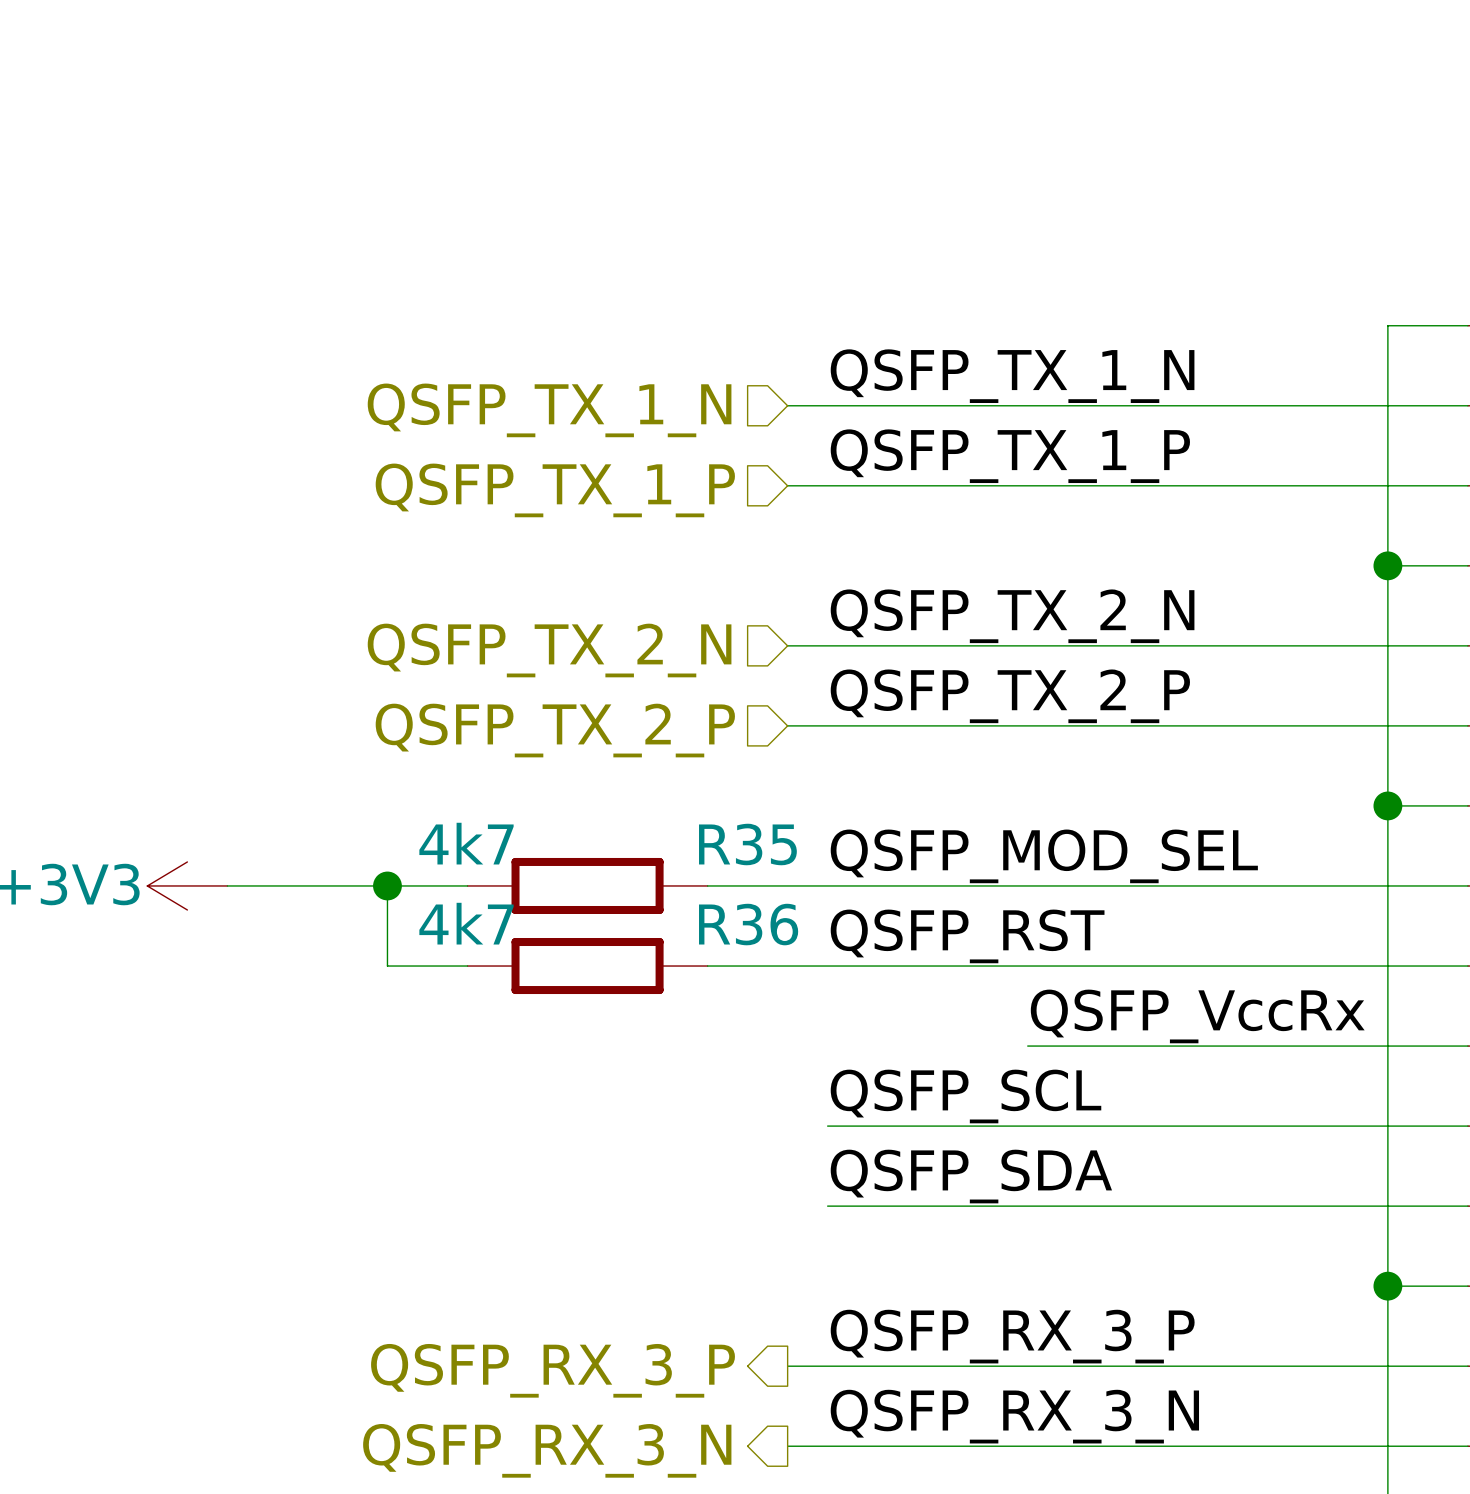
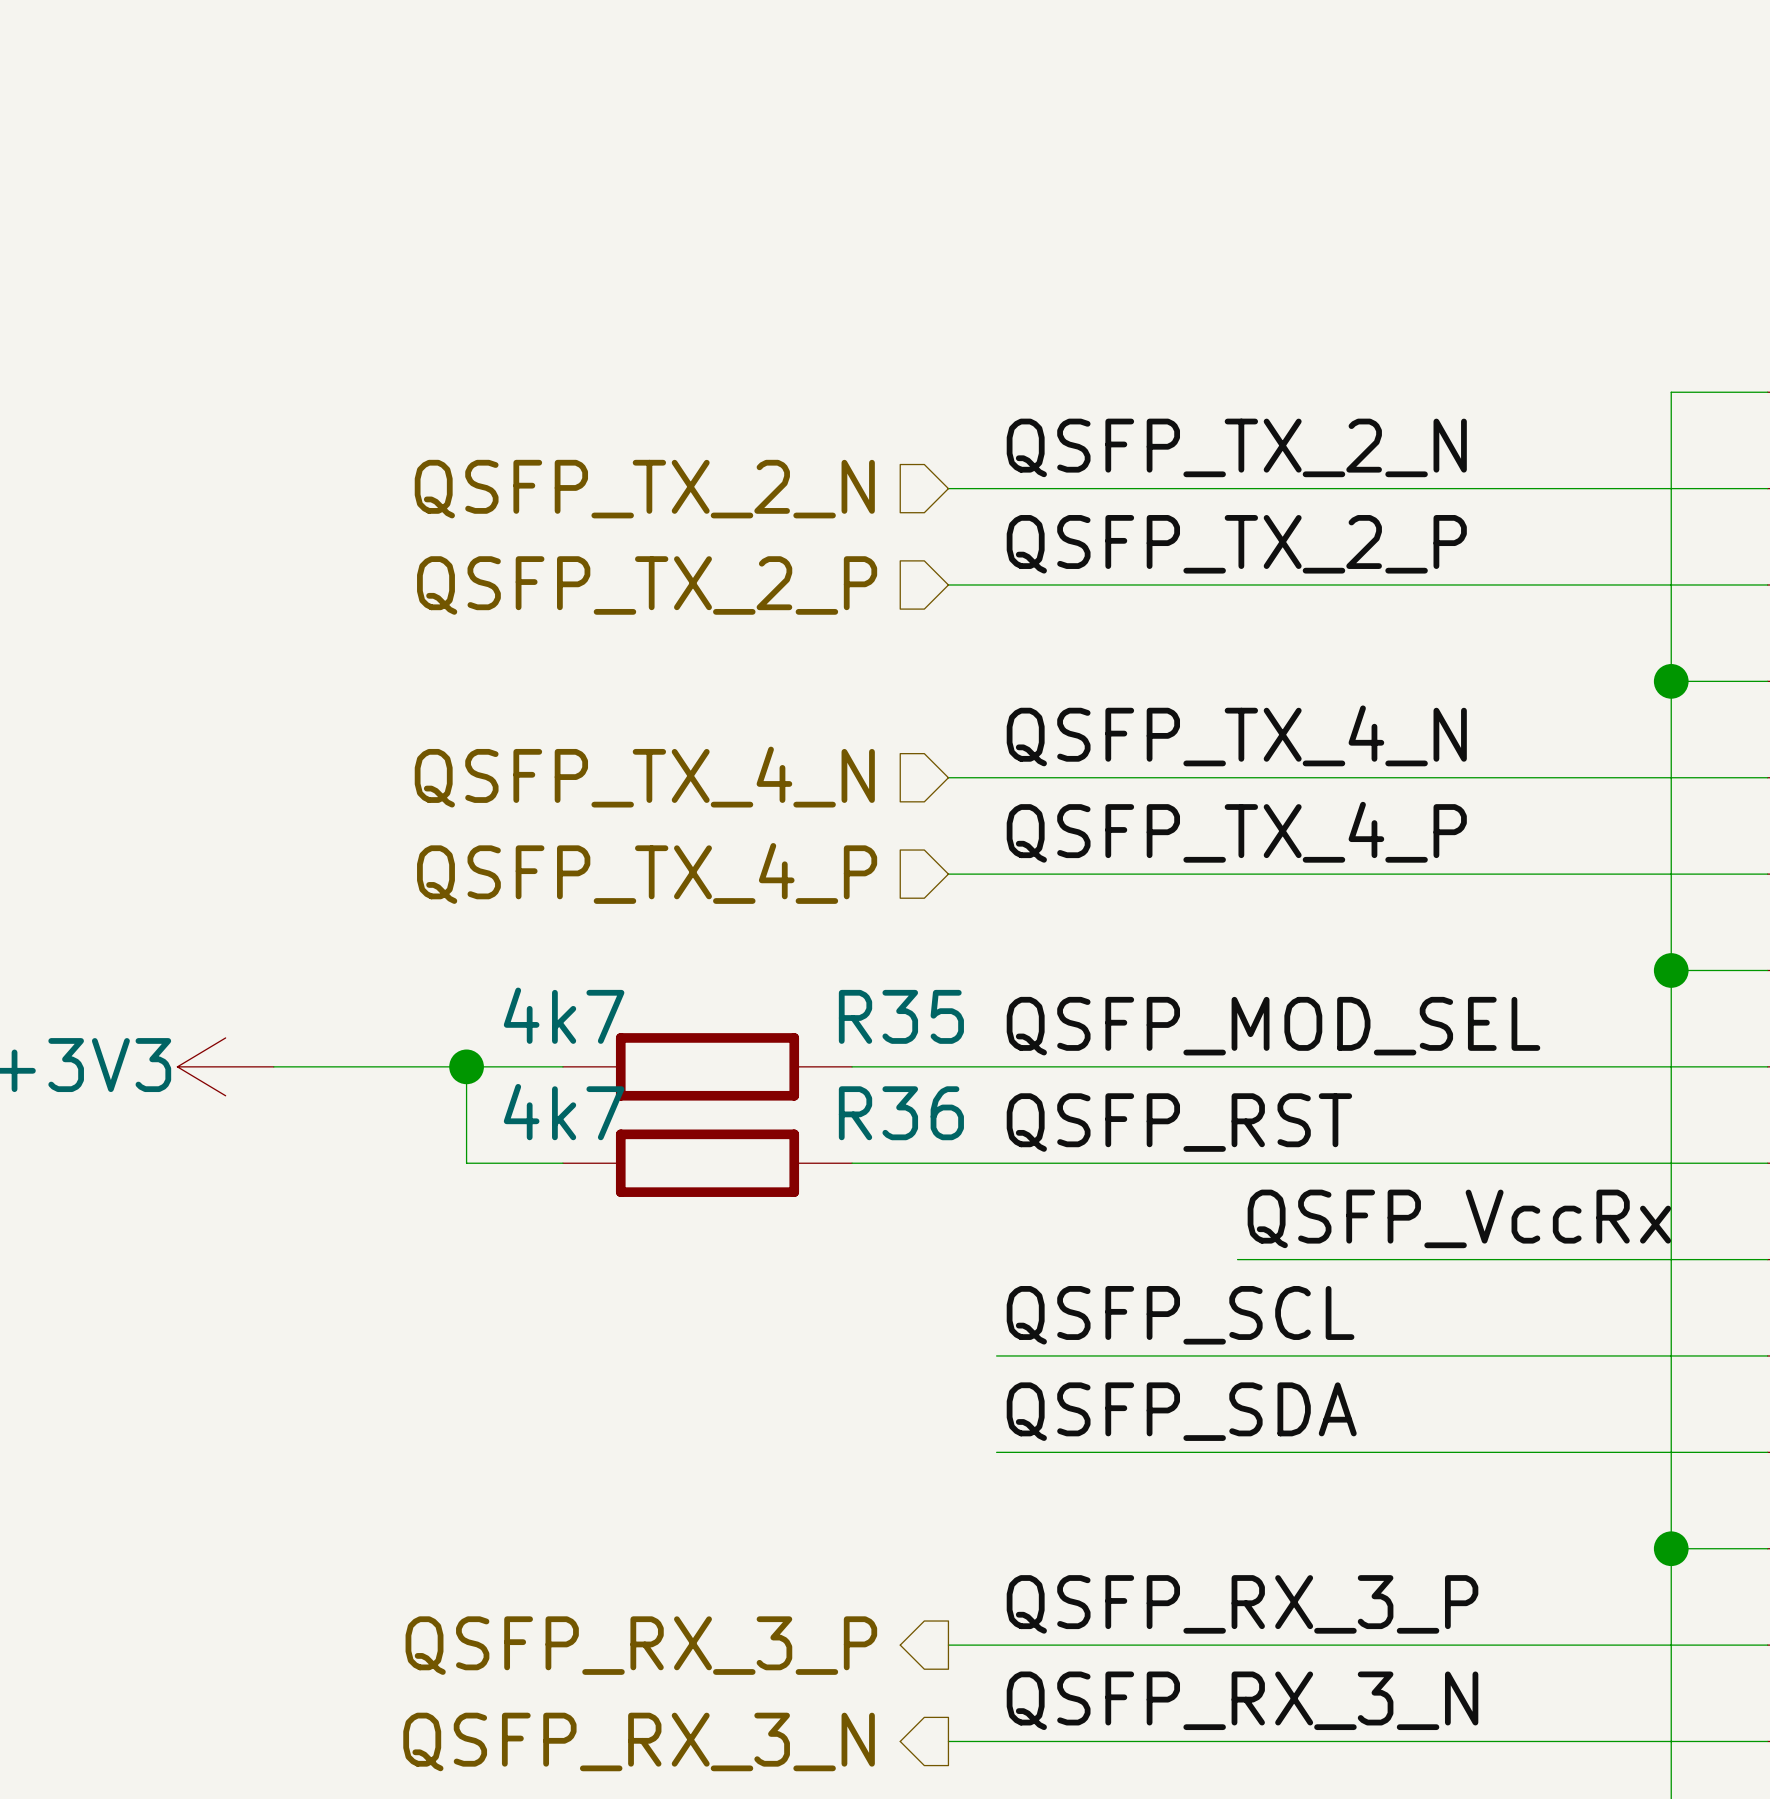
label: QSFP_TX_1_N (1012, 376) -> QSFP_TX_2_N (1236, 447)
hierarchical label: QSFP_TX_1_N (549, 410) -> QSFP_TX_2_N (644, 489)
label: QSFP_TX_1_P (1010, 456) -> QSFP_TX_2_P (1236, 544)
hierarchical label: QSFP_TX_1_P (555, 490) -> QSFP_TX_2_P (647, 585)
label: QSFP_TX_2_N (1012, 616) -> QSFP_TX_4_N (1236, 735)
hierarchical label: QSFP_TX_2_N (549, 650) -> QSFP_TX_4_N (644, 777)
label: QSFP_TX_2_P (1010, 696) -> QSFP_TX_4_P (1236, 832)
hierarchical label: QSFP_TX_2_P (555, 730) -> QSFP_TX_4_P (647, 873)

